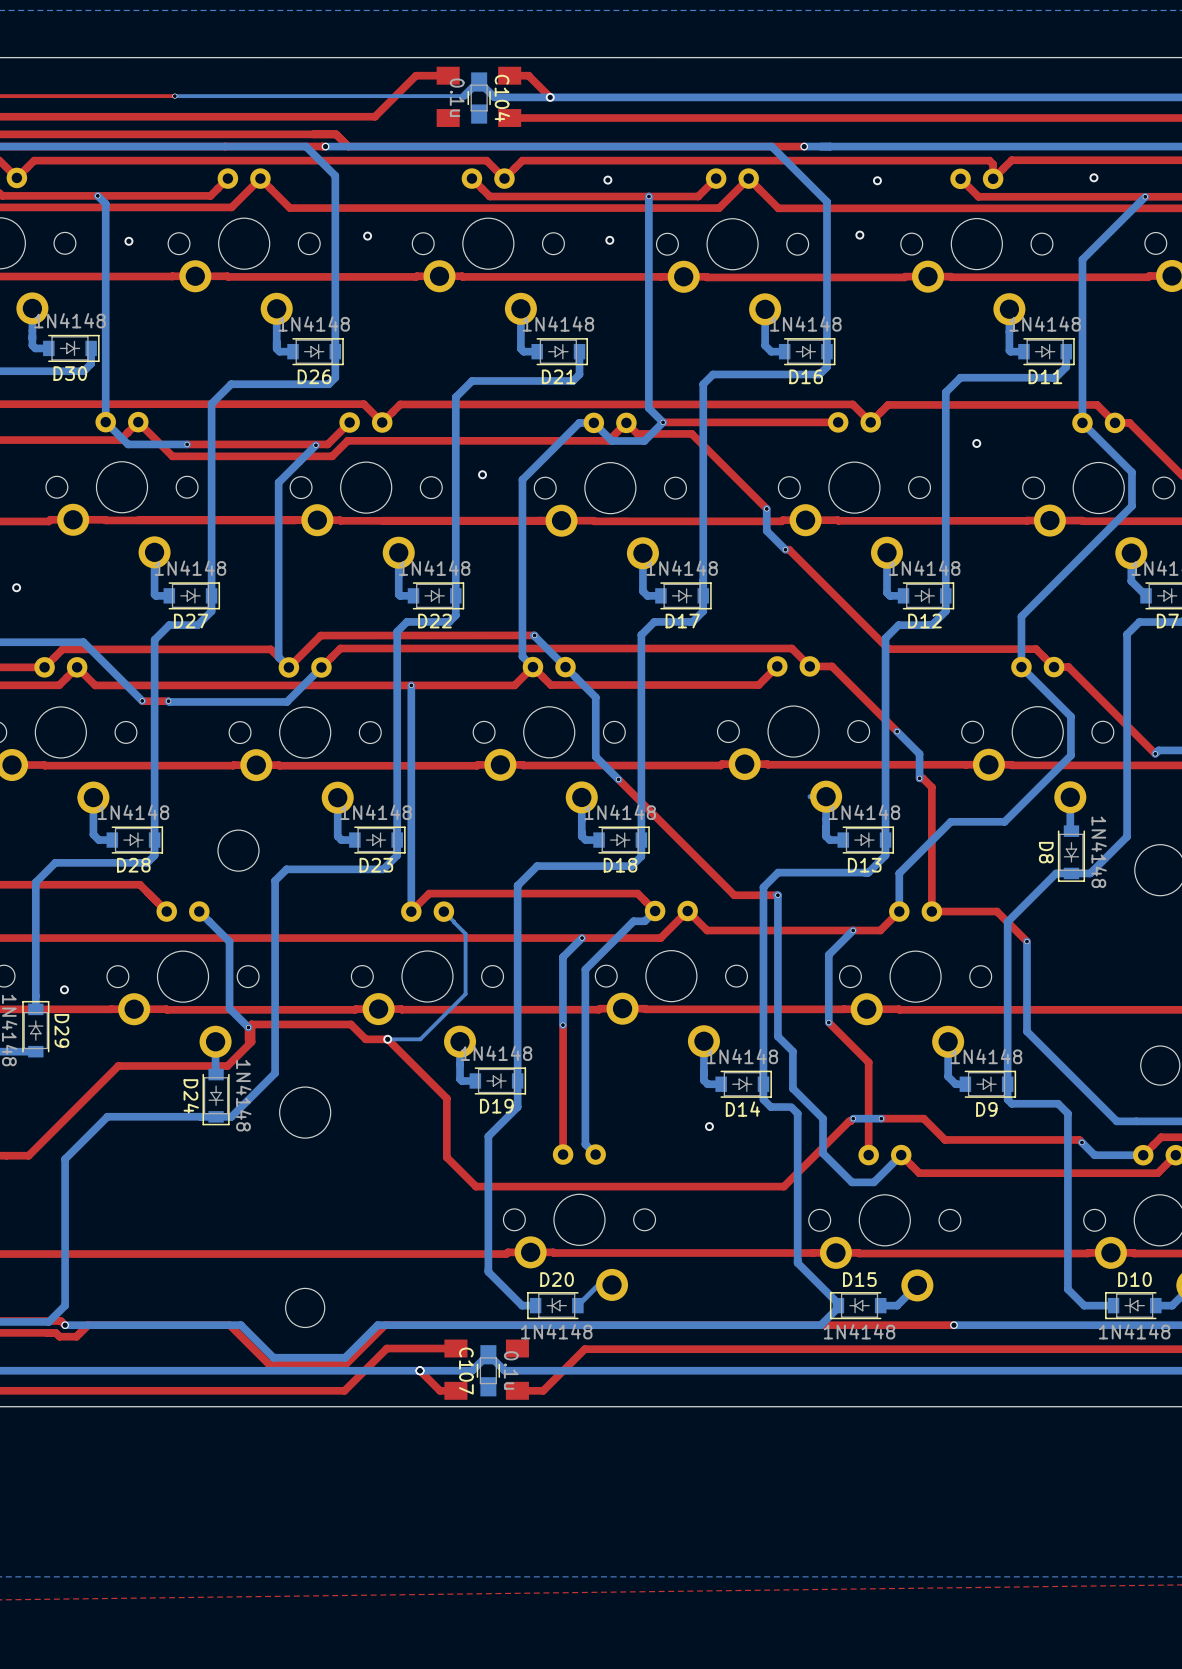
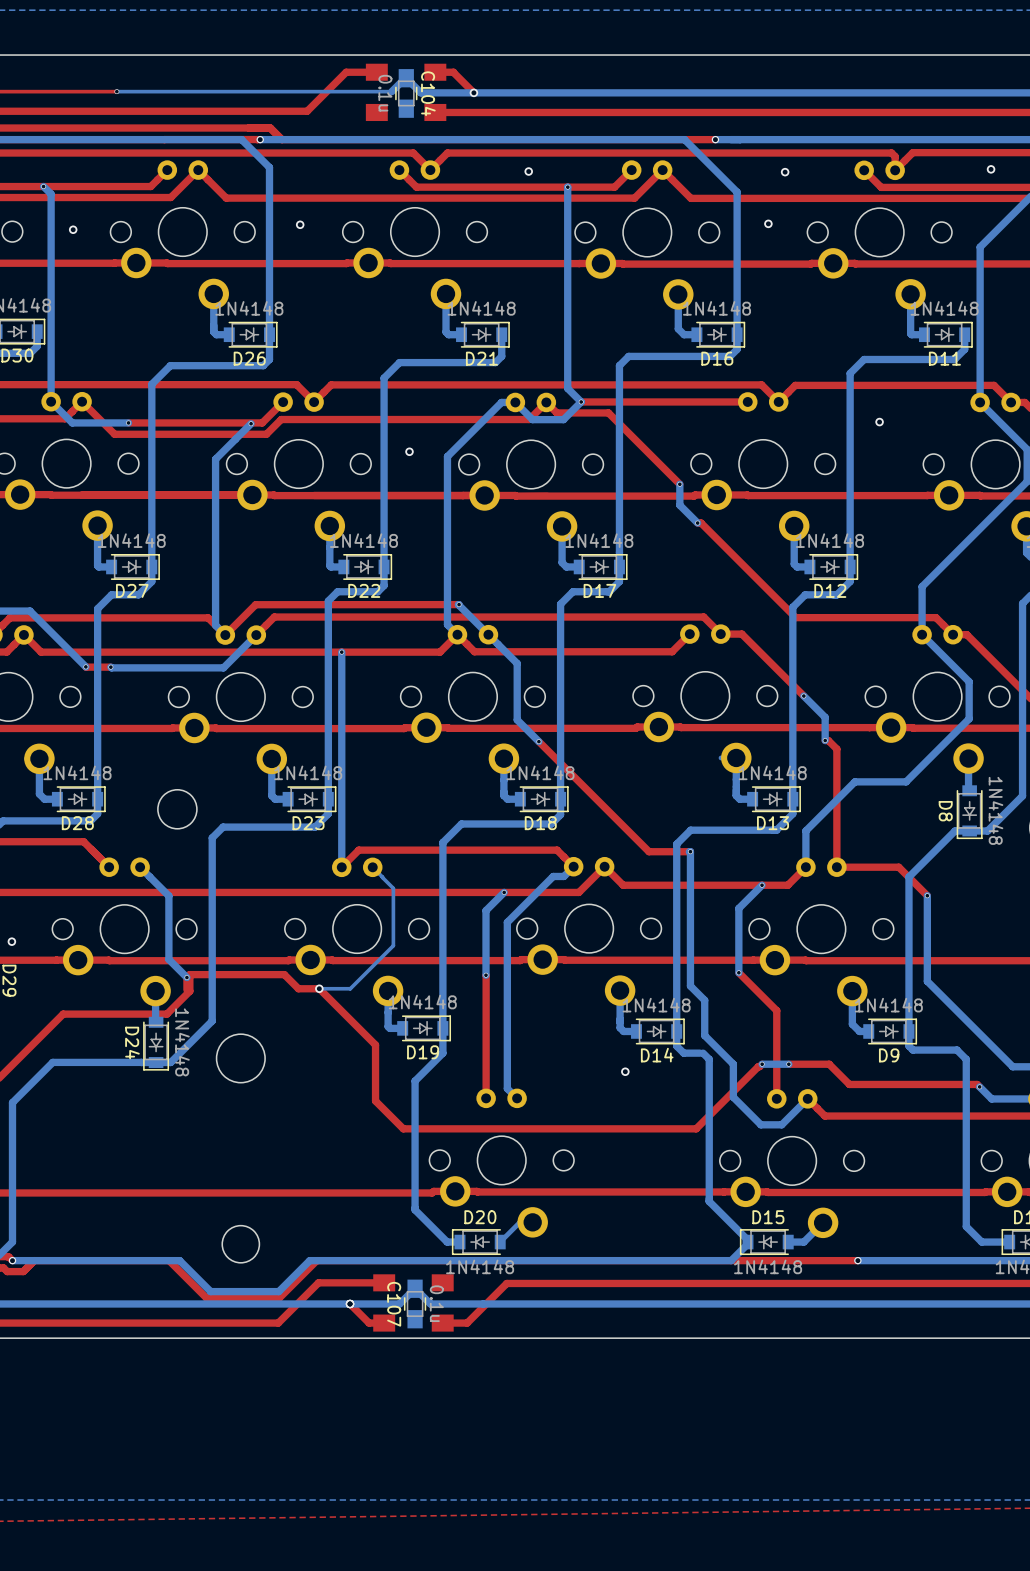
via: (609, 240) -> none

